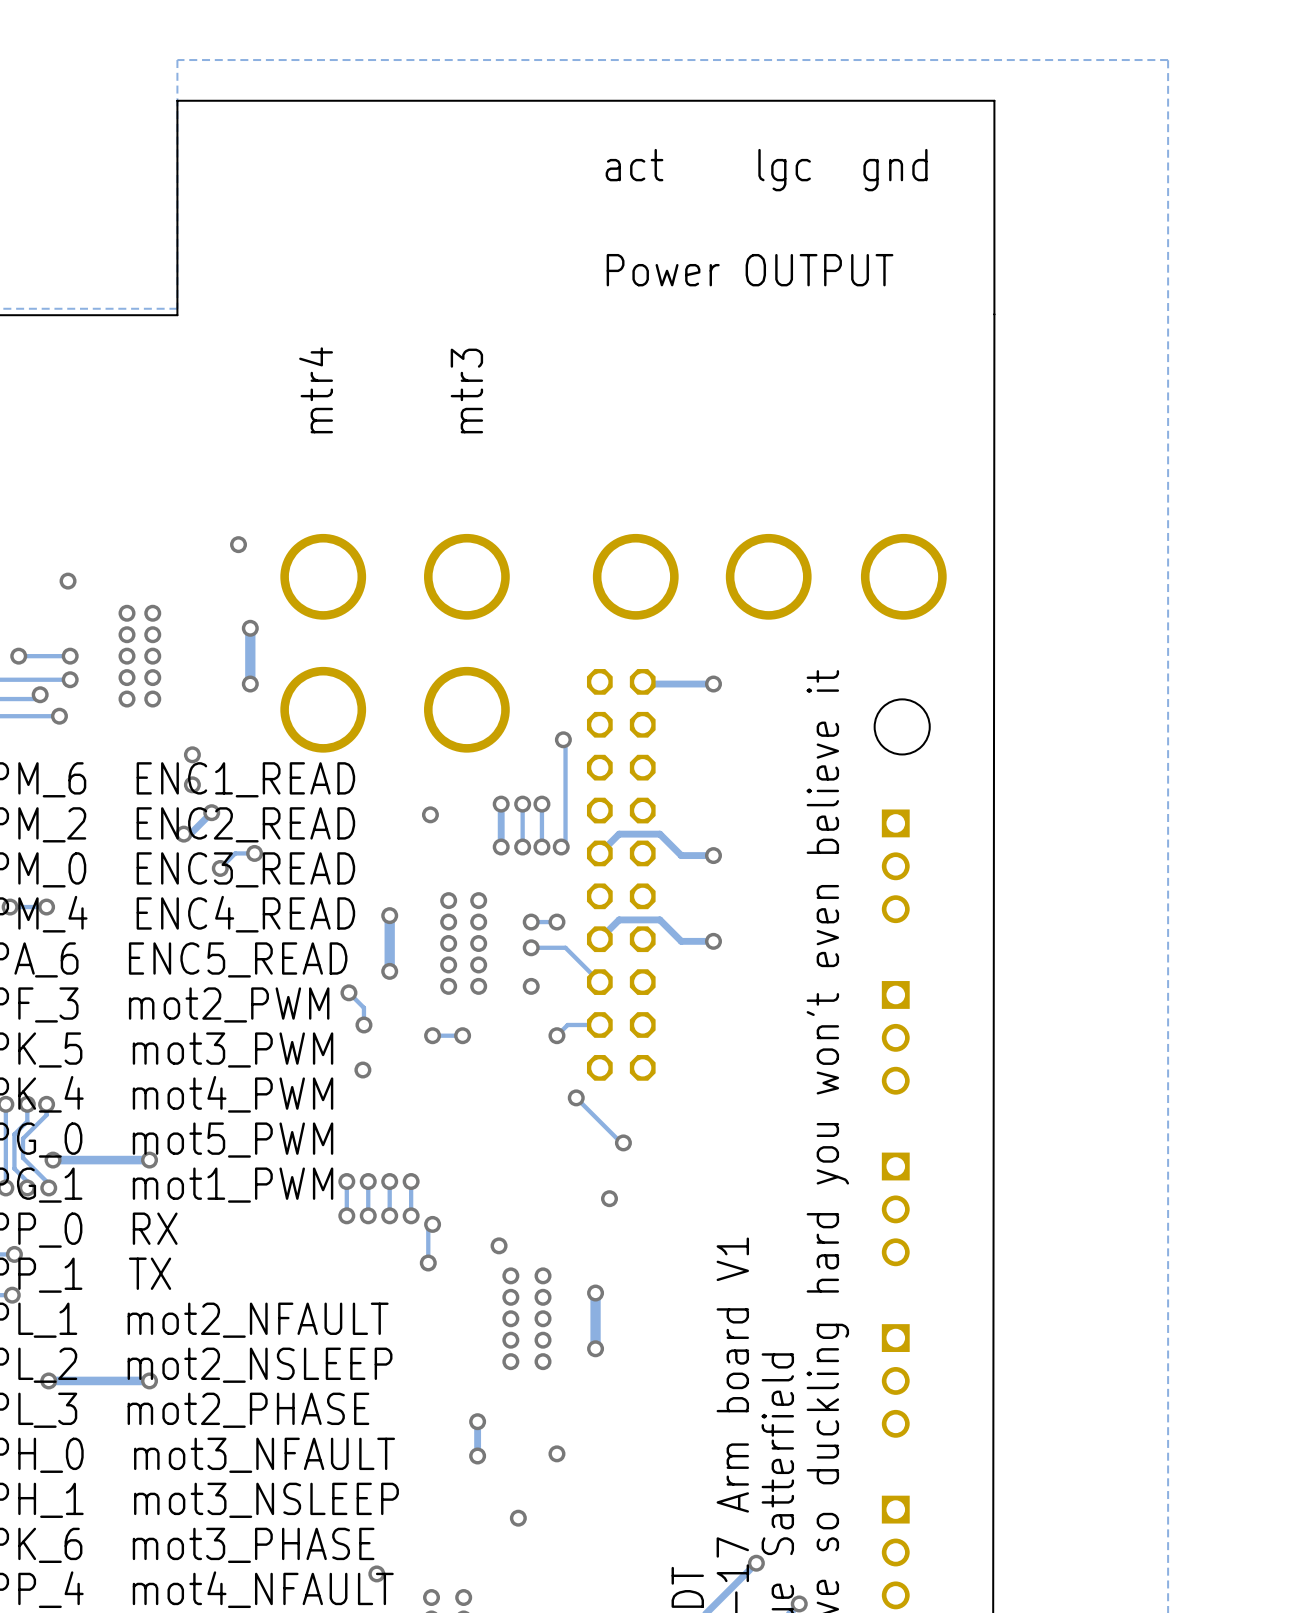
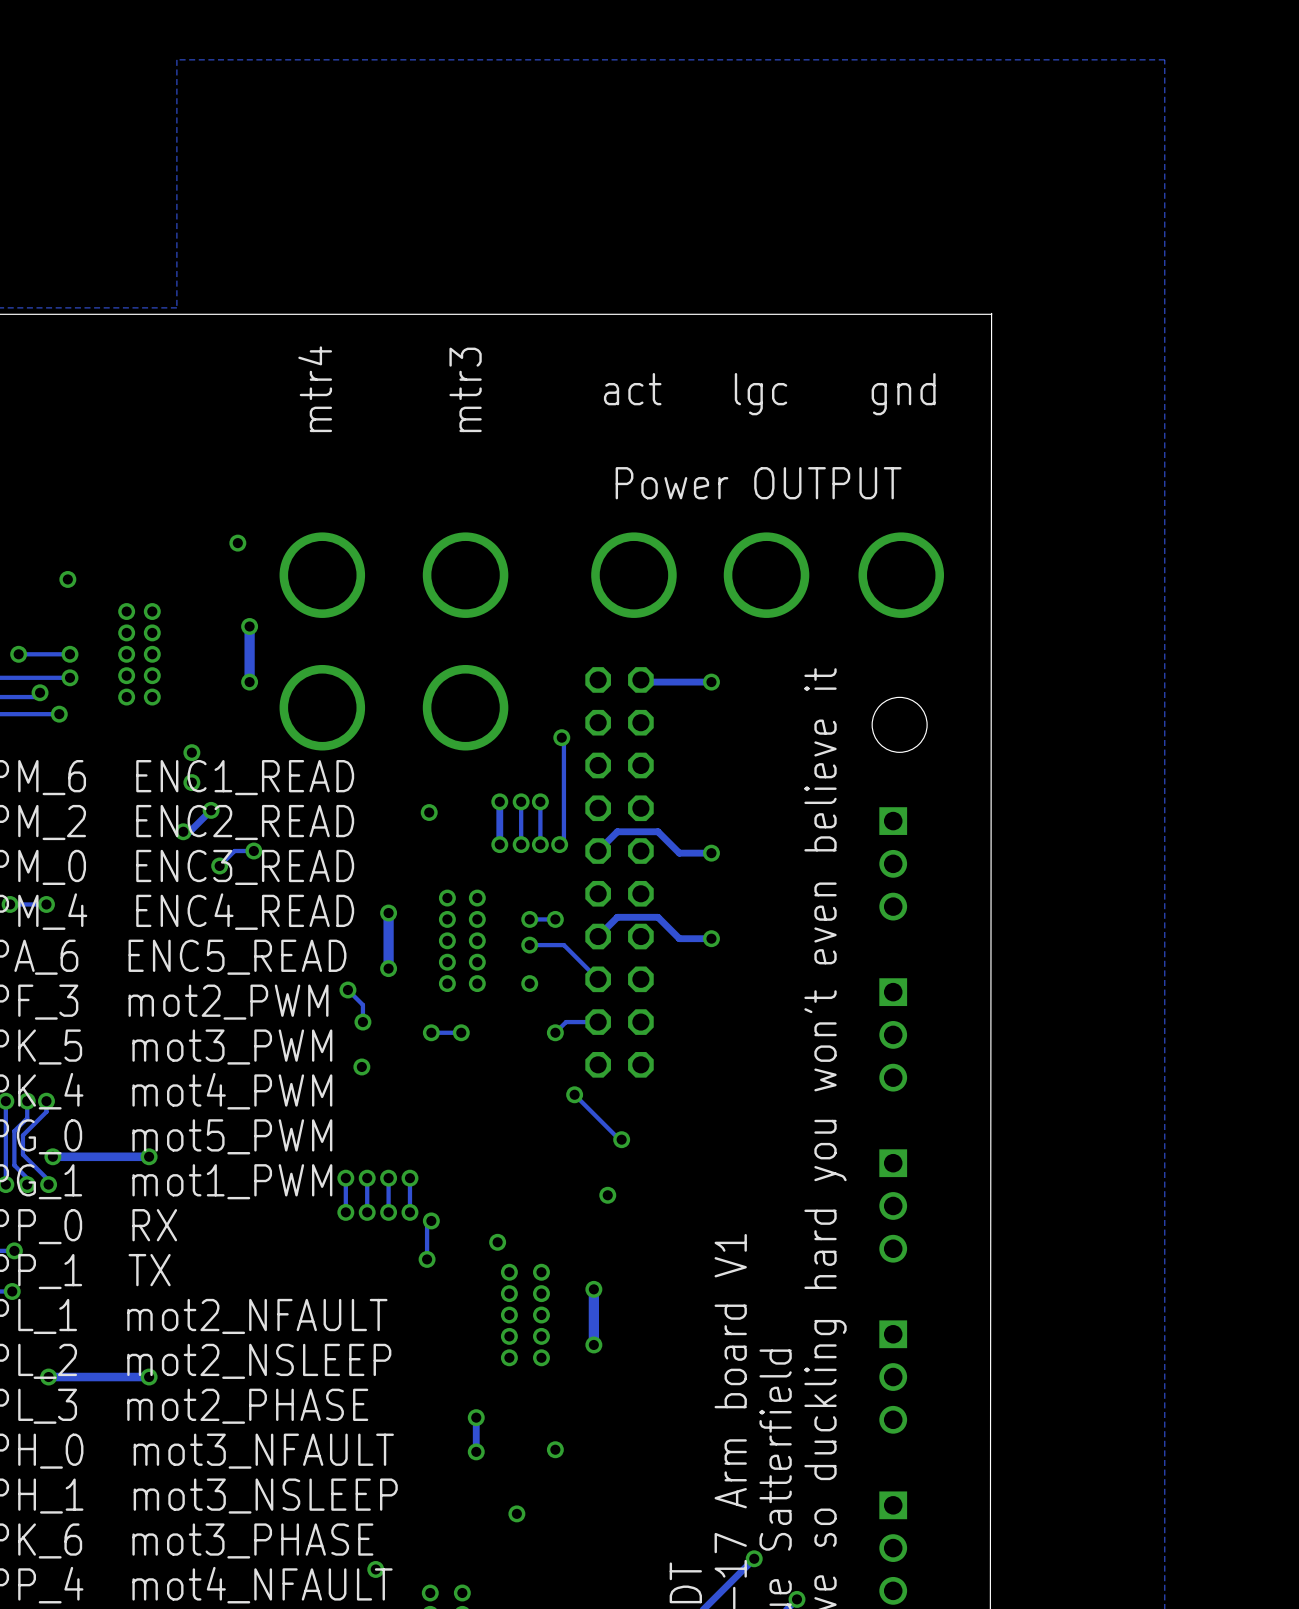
text position: act (634, 165) -> act (632, 389)
text position: lgc (784, 170) -> lgc (761, 394)
text position: gnd (895, 170) -> gnd (903, 394)
text position: Power OUTPUT (750, 270) -> Power OUTPUT (758, 483)
board edge: (994, 314) (994, 100) (177, 100) (177, 315) -> (991, 313) (176, 314)

